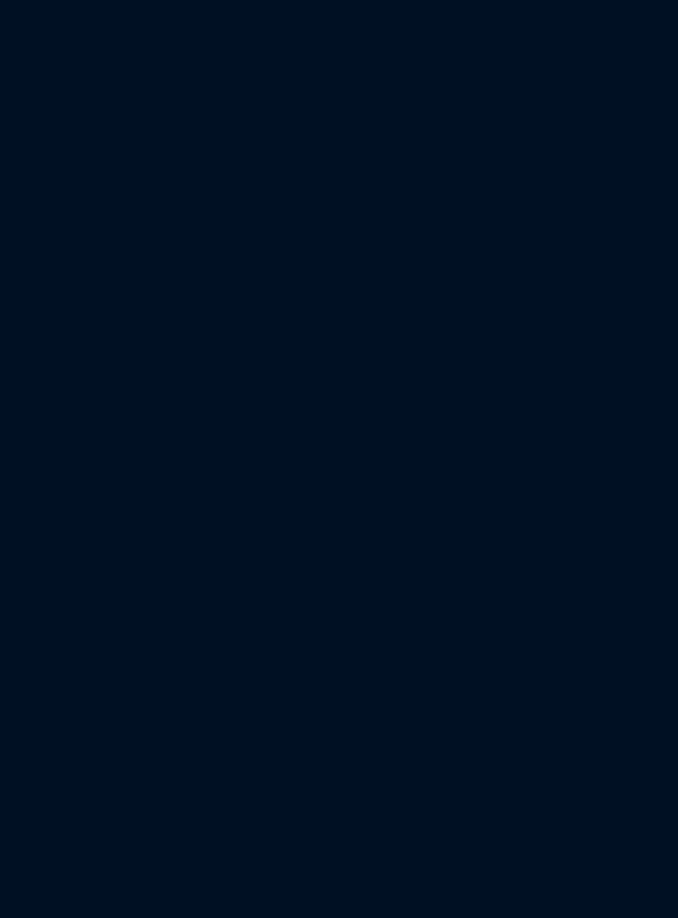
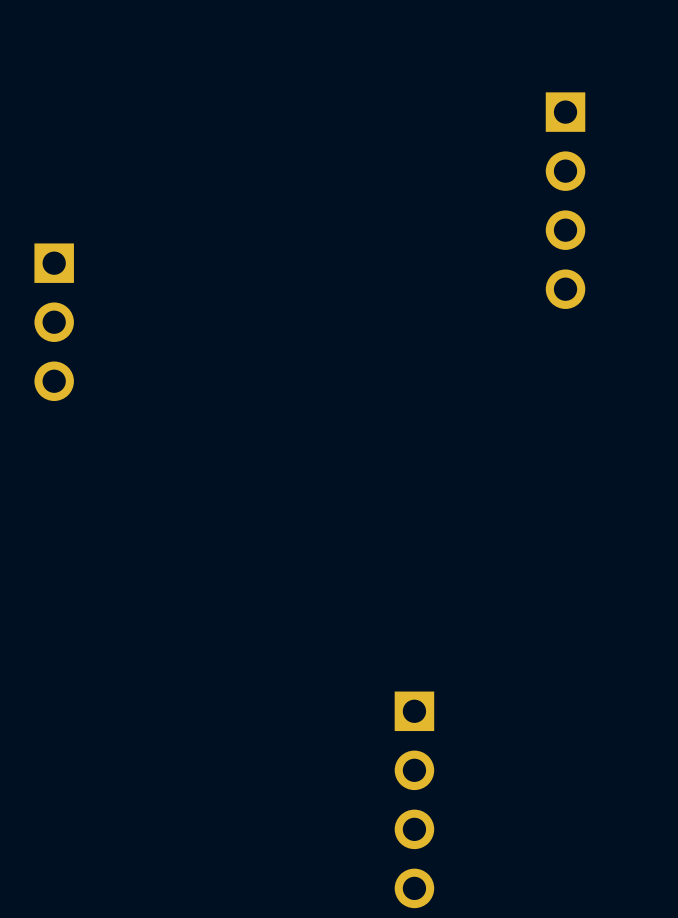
part: none -> (565, 200)
part: none -> (54, 322)
part: none -> (414, 799)

